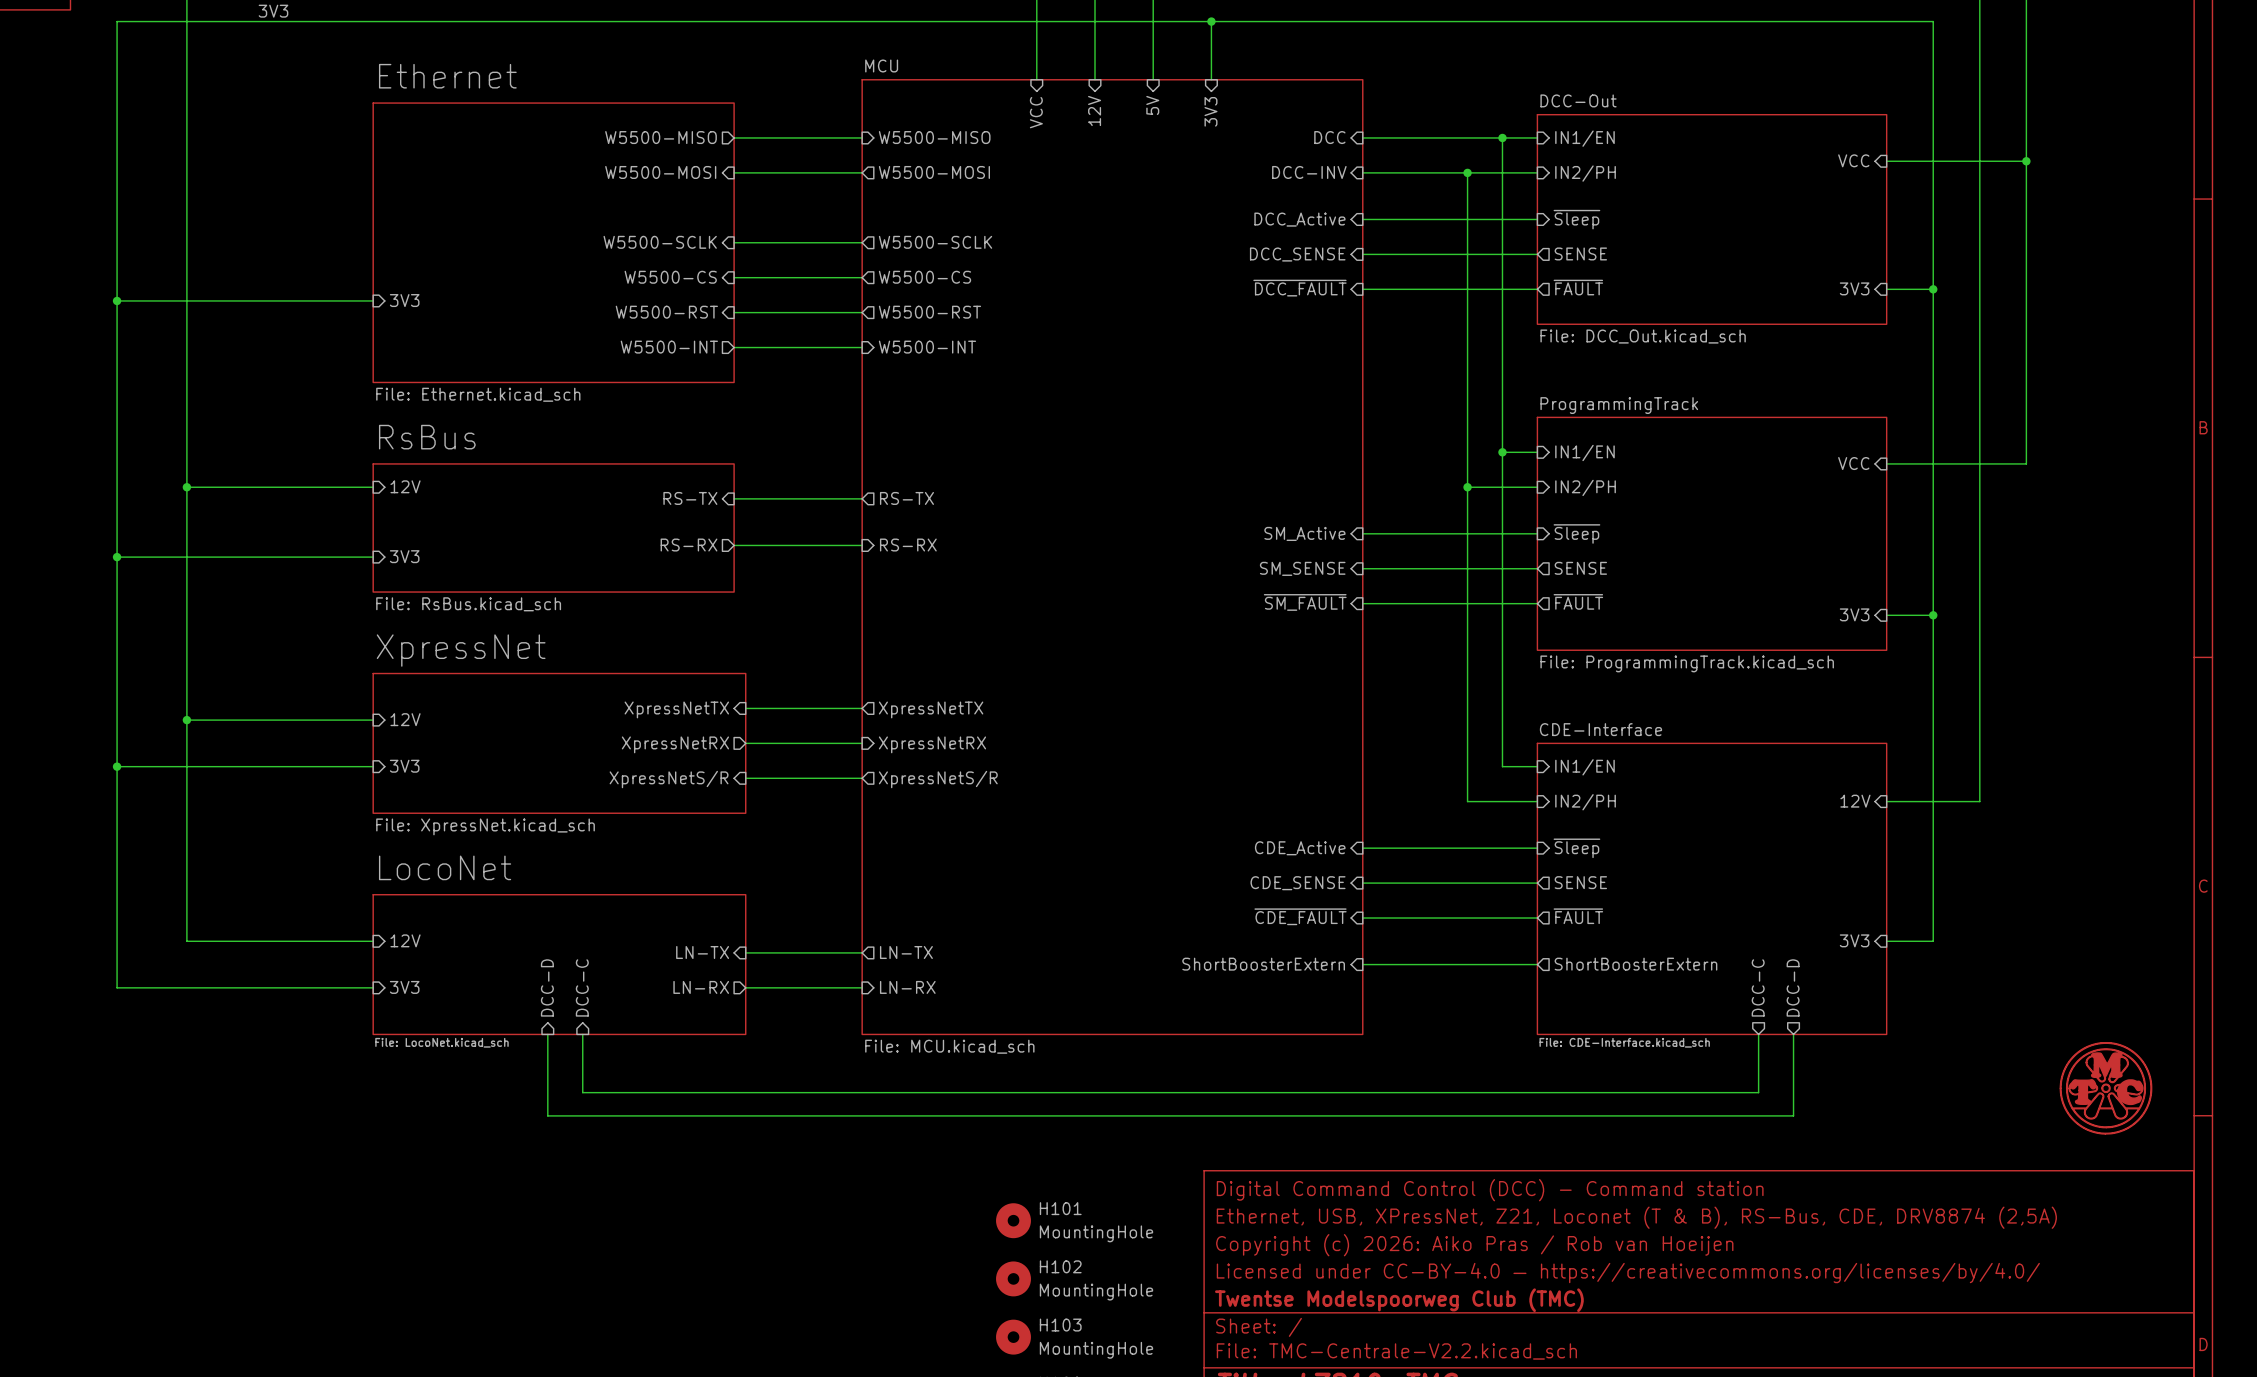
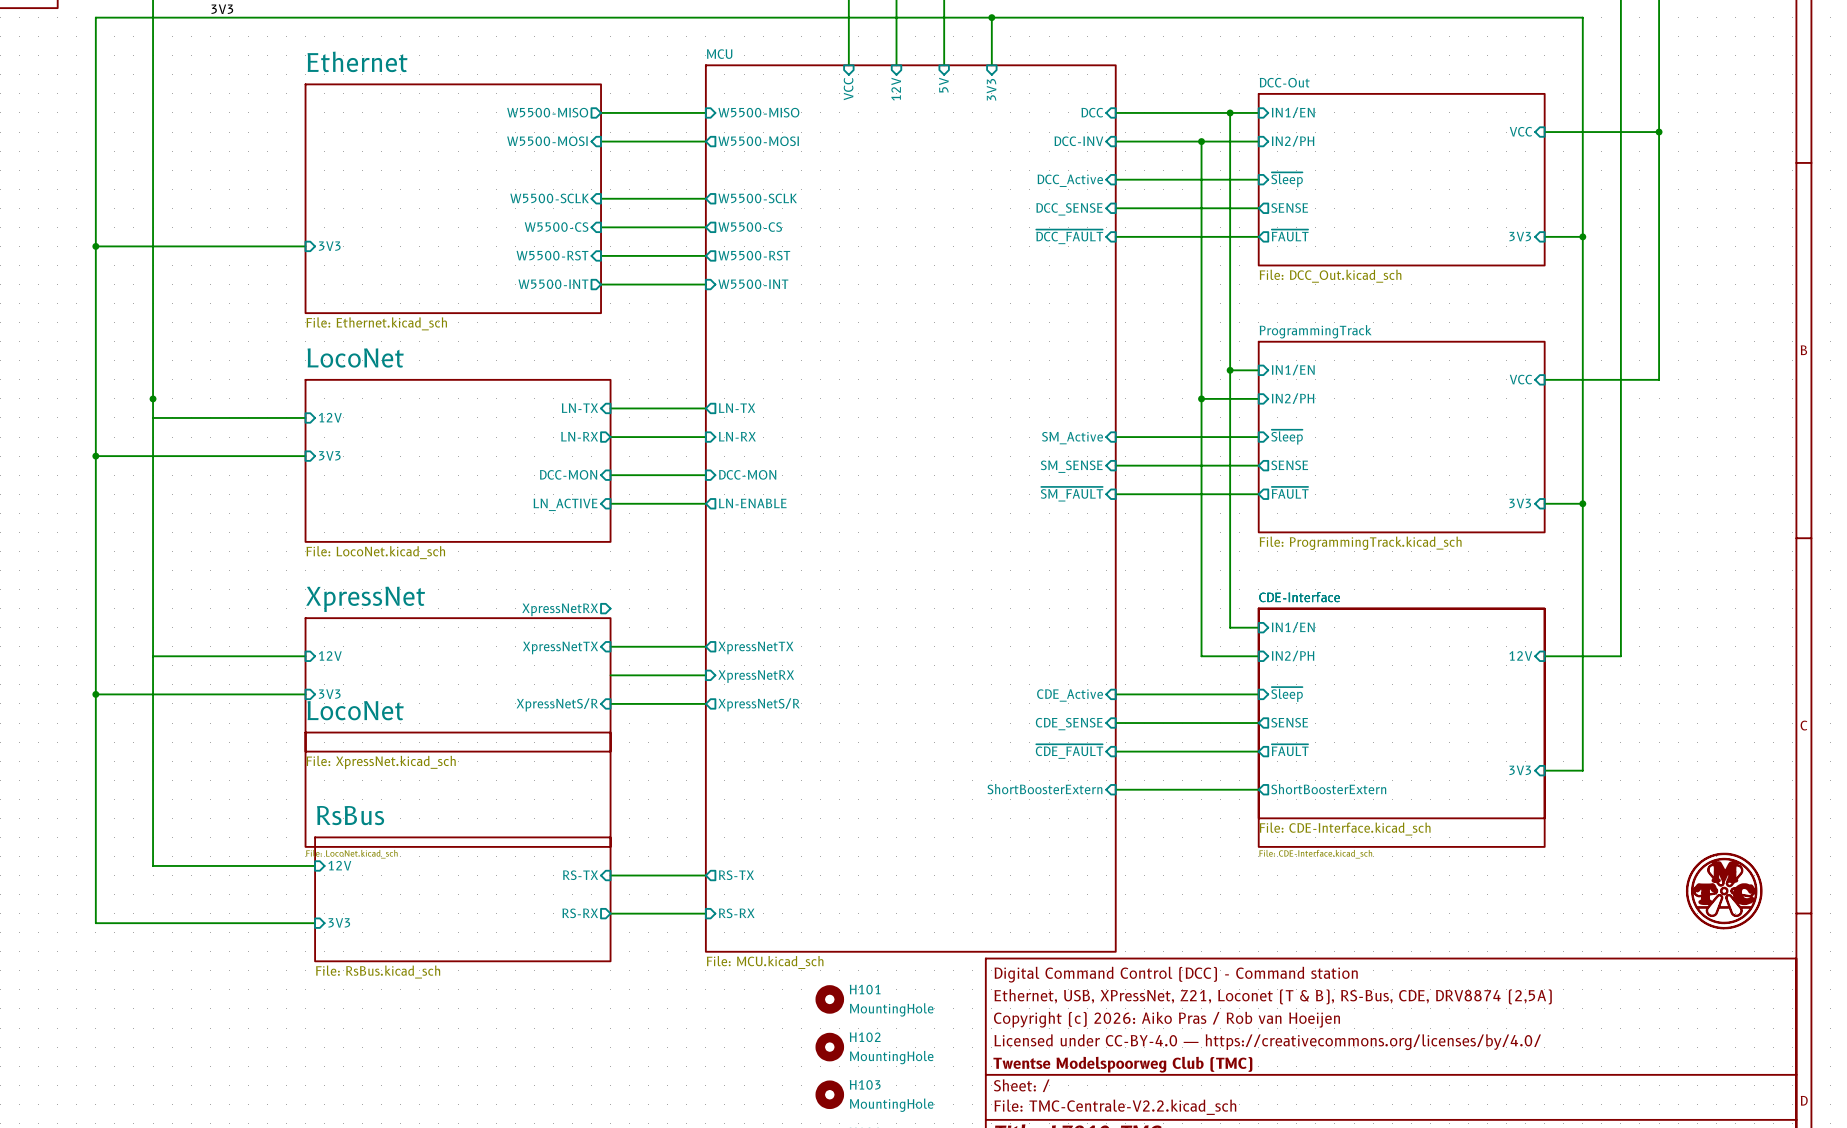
sheet pin position: 12V (405, 486) -> 12V (330, 417)
wire: (186, 487) (373, 487) -> (153, 417) (305, 417)
sheet pin: RS-TX (690, 498) -> none
sheet pin: none -> LN-TX (579, 408)
wire: (734, 498) (745, 498) -> none
sheet pin: RS-TX (906, 498) -> LN-TX (737, 408)
sheet RsBus: File: RsBus.kicad_sch (553, 527) -> none
sheet pin: none -> LN-RX (579, 436)
wire: none -> (610, 437) (705, 437)
sheet pin: none -> LN-RX (737, 436)
sheet pin: RS-RX (689, 545) -> none
wire: (734, 545) (862, 545) -> none
sheet pin: RS-RX (908, 545) -> none
sheet MCU: File: MCU.kicad_sch (1112, 557) -> none
sheet LocoNet: none -> File: LocoNet.kicad_sch (458, 460)
sheet pin: none -> DCC-MON (568, 474)
sheet pin: none -> DCC-MON (747, 474)
wire: none -> (610, 475) (705, 475)
sheet pin: none -> LN-ENABLE (752, 503)
sheet pin: none -> LN_ACTIVE (565, 504)
wire: none -> (610, 503) (705, 503)
sheet MCU: none -> File: MCU.kicad_sch (910, 508)
wire: (745, 708) (862, 708) -> (610, 646) (705, 646)
sheet pin position: XpressNetTX (676, 709) -> XpressNetTX (560, 647)
sheet pin position: XpressNetTX (931, 709) -> XpressNetTX (755, 647)
sheet pin: 12V (405, 719) -> none
wire: (186, 720) (373, 720) -> (153, 656) (305, 656)
junction: (186, 720) -> none
sheet XpressNet: File: XpressNet.kicad_sch (559, 743) -> none
wire: (745, 743) (862, 743) -> (610, 675) (705, 675)
sheet pin position: XpressNetRX (932, 744) -> XpressNetRX (756, 676)
wire: (117, 766) (373, 766) -> (95, 694) (305, 694)
junction: (117, 766) -> none
sheet pin: 3V3 (404, 766) -> none
wire: (745, 778) (862, 778) -> (610, 703) (705, 703)
sheet pin position: XpressNetS/R (669, 779) -> XpressNetS/R (557, 704)
sheet pin position: XpressNetS/R (938, 779) -> XpressNetS/R (759, 704)
sheet pin: none -> 12V (330, 655)
sheet XpressNet: none -> File: XpressNet.kicad_sch (458, 684)
sheet pin: none -> 3V3 (329, 694)
junction: none -> (95, 694)
sheet CDE-Interface: none -> File: CDE-Interface.kicad_sch (1401, 713)
sheet pin: 12V (405, 940) -> none
wire: (186, 941) (373, 941) -> (153, 770) (153, 865) (315, 865)
sheet pin: LN-TX (702, 952) -> none
wire: (745, 952) (862, 952) -> none
sheet pin: LN-TX (906, 952) -> none
wire: (117, 987) (373, 987) -> (95, 808) (95, 923) (315, 923)
sheet pin: 3V3 (404, 987) -> none
sheet pin: DCC-D (547, 987) -> none
sheet pin: DCC-C (582, 987) -> none
sheet pin: LN-RX (701, 987) -> none
wire: (745, 987) (862, 987) -> (610, 875) (705, 875)
sheet pin: LN-RX (907, 987) -> none
sheet pin: DCC-C (1758, 987) -> none
sheet pin: DCC-D (1793, 987) -> none
wire: (547, 1034) (547, 1115) (745, 1115) -> none
wire: (582, 1034) (582, 1092) (1758, 1092) (1758, 1034) -> none
wire: (1793, 1034) (1793, 1115) (862, 1115) -> none
sheet pin: none -> 12V (339, 865)
sheet pin: none -> RS-TX (580, 875)
sheet pin: none -> RS-TX (736, 875)
sheet RsBus: none -> File: RsBus.kicad_sch (462, 899)
sheet pin: none -> RS-RX (580, 913)
sheet pin: none -> RS-RX (736, 913)
sheet pin: none -> 3V3 (339, 922)

